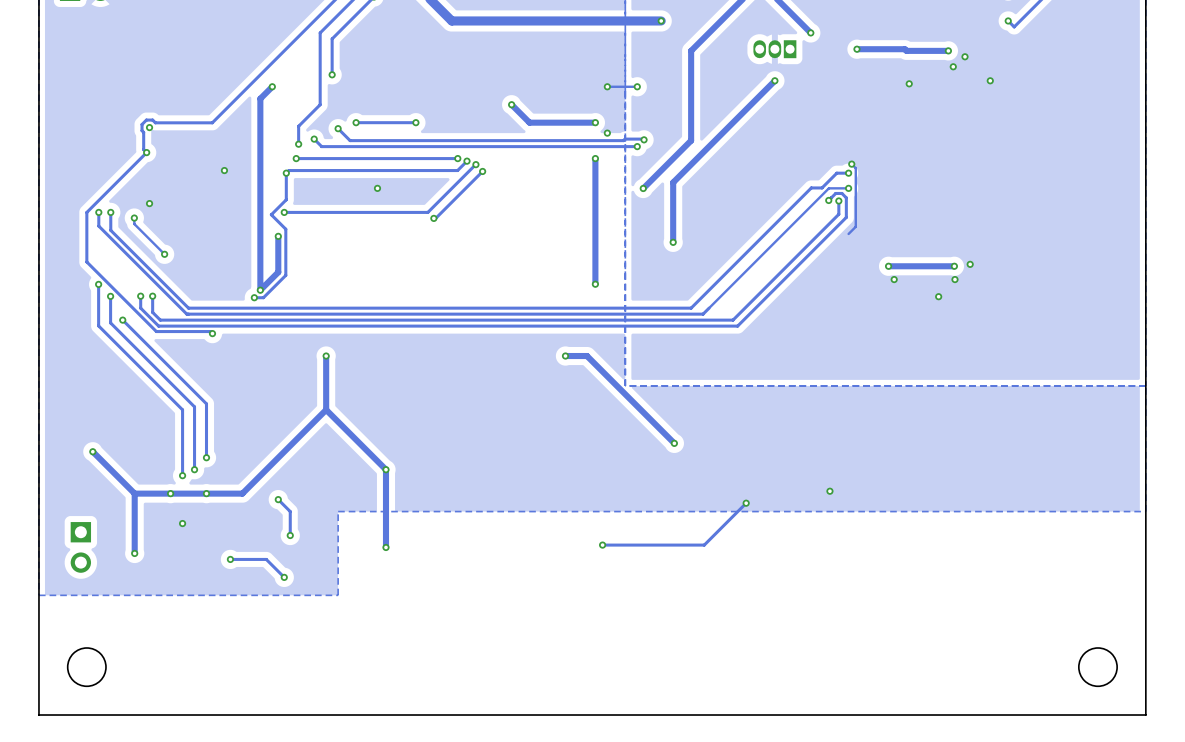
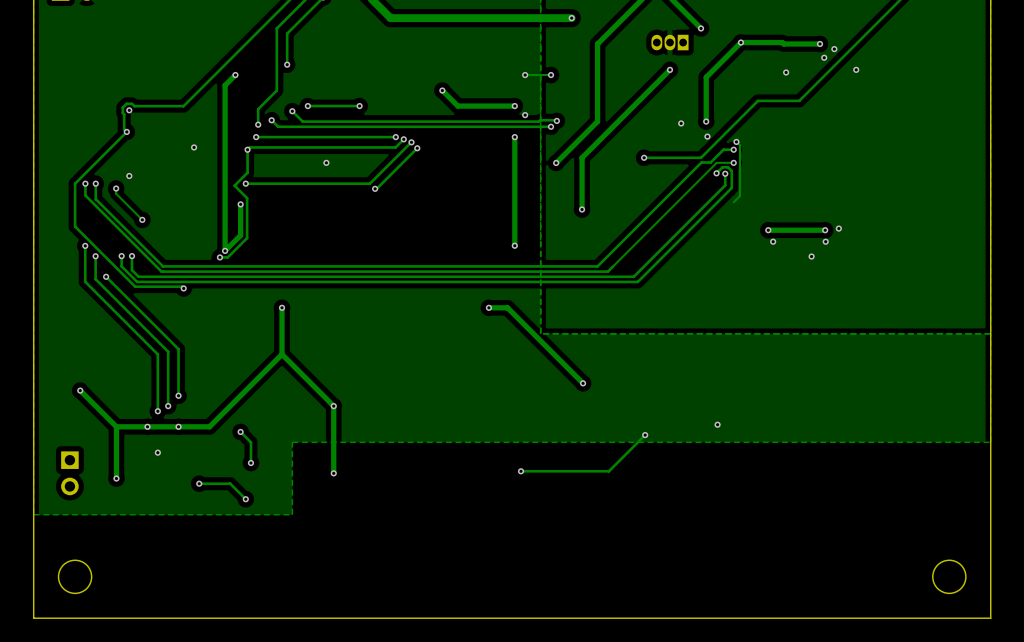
track: (1008, 20) (1014, 26) -> (644, 157) (701, 157) (757, 100) (799, 100) (876, 23)
via: (1008, 20) -> none
track: none -> (740, 42) (706, 77) (706, 121)
via: none -> (706, 121)
via: none -> (681, 123)
via: none -> (707, 136)
via: none -> (644, 157)

